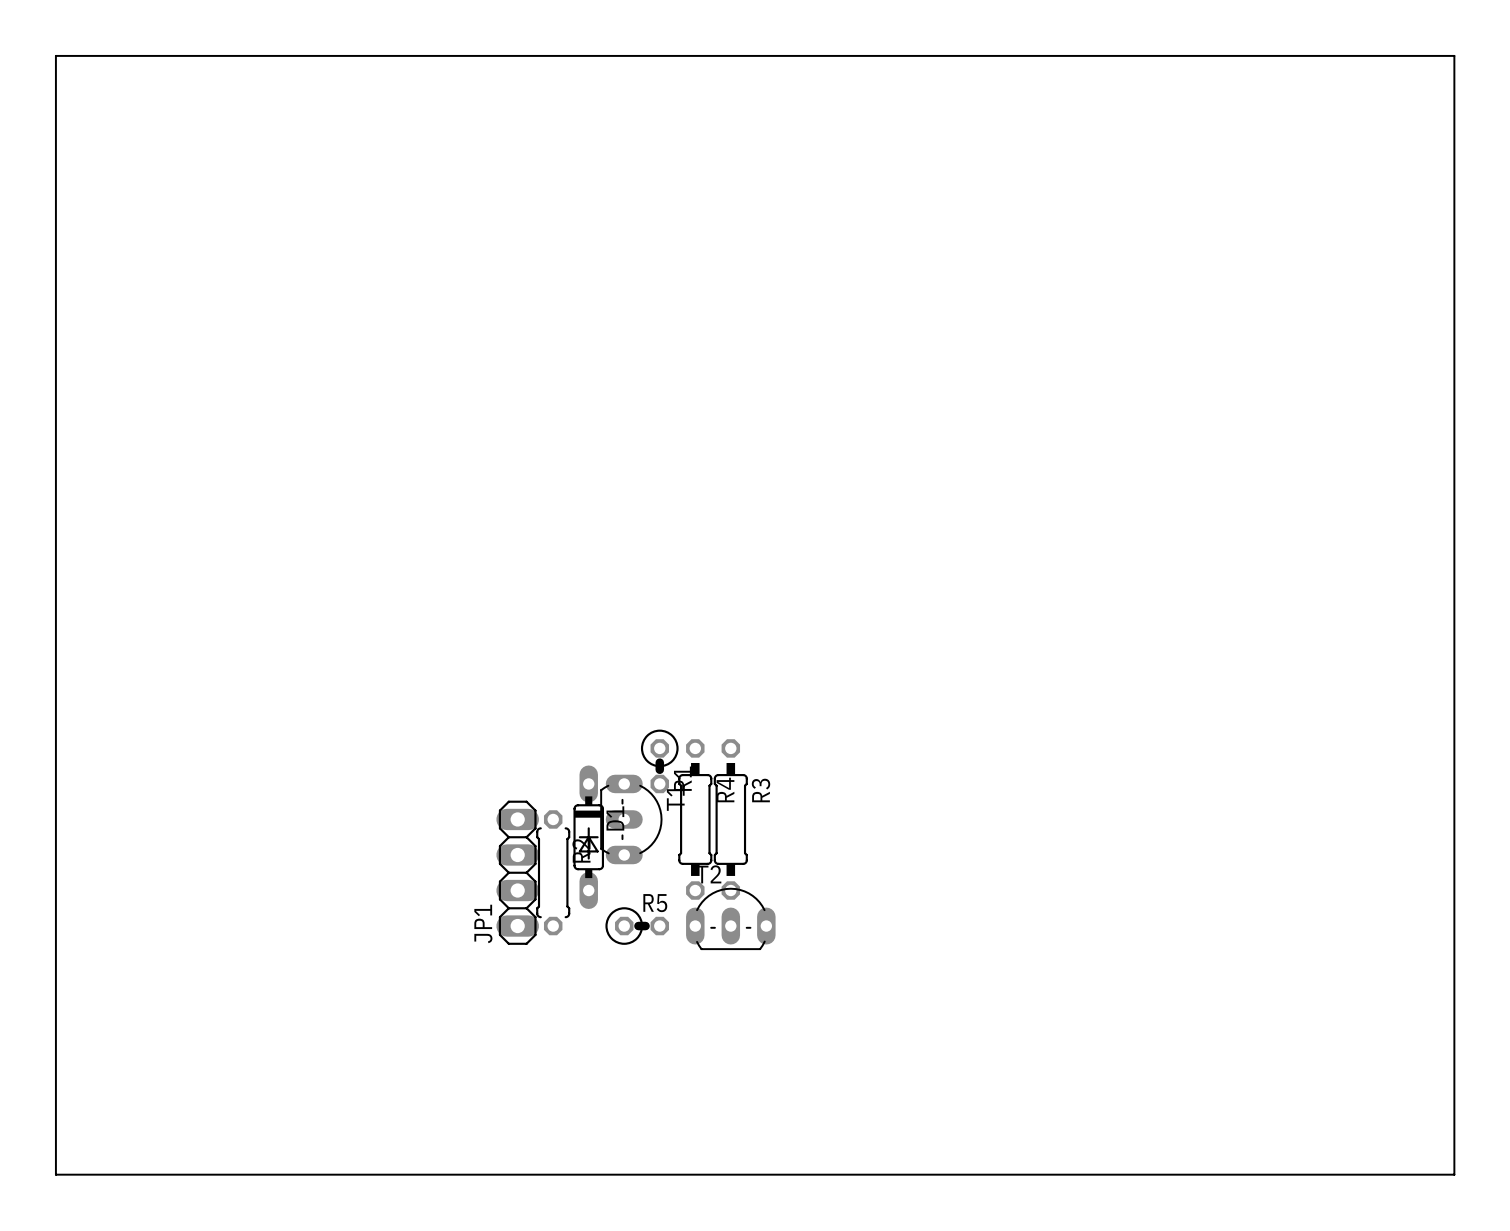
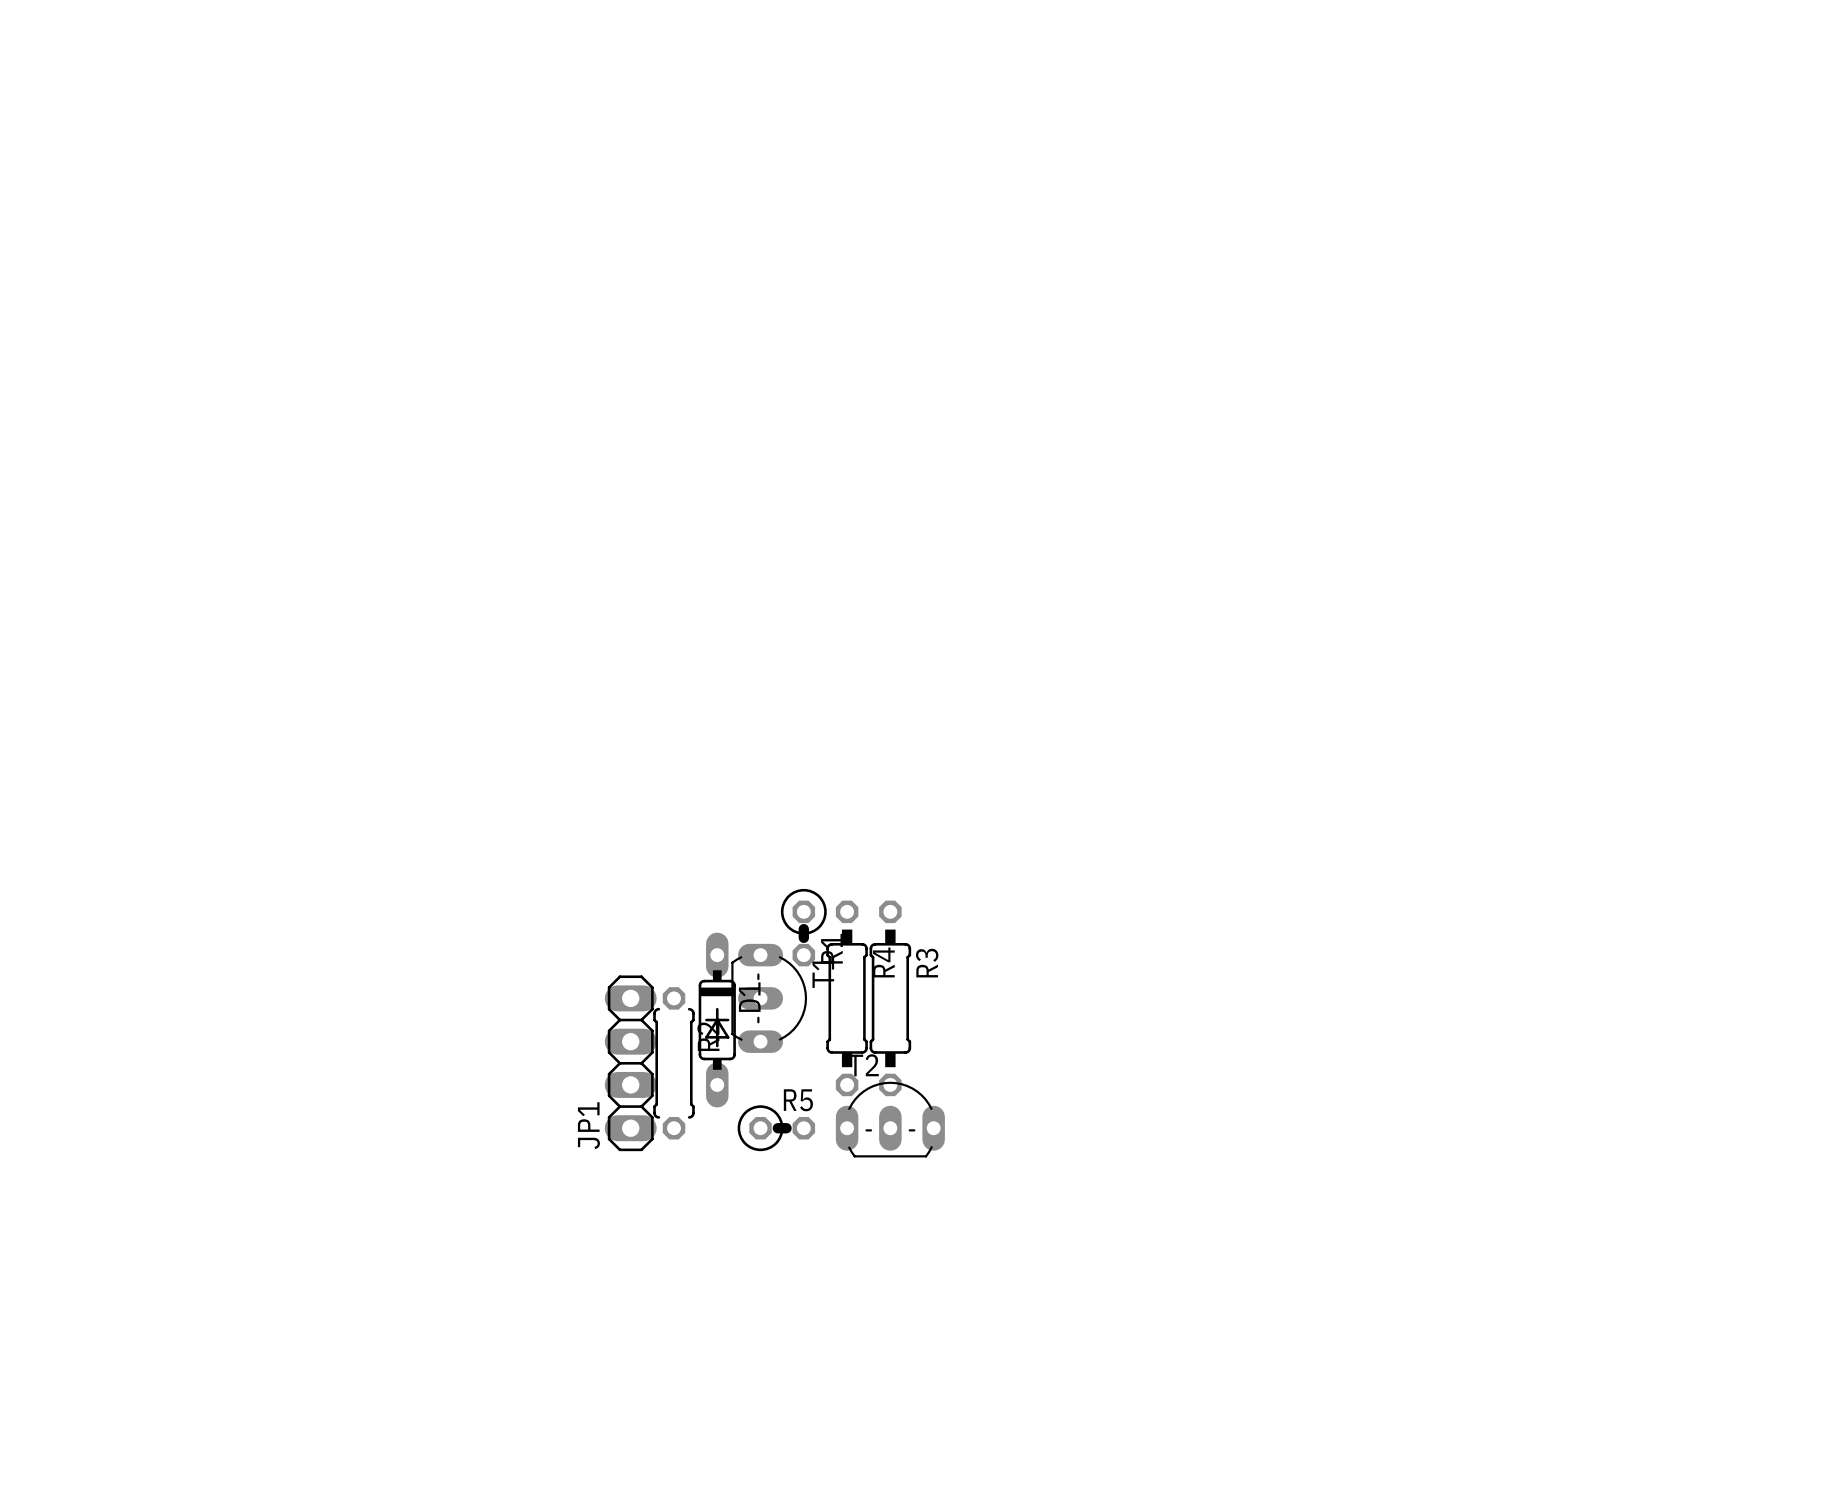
board edge: (55, 55) (1454, 55) (1454, 1174) (55, 1174) (55, 55) -> none

